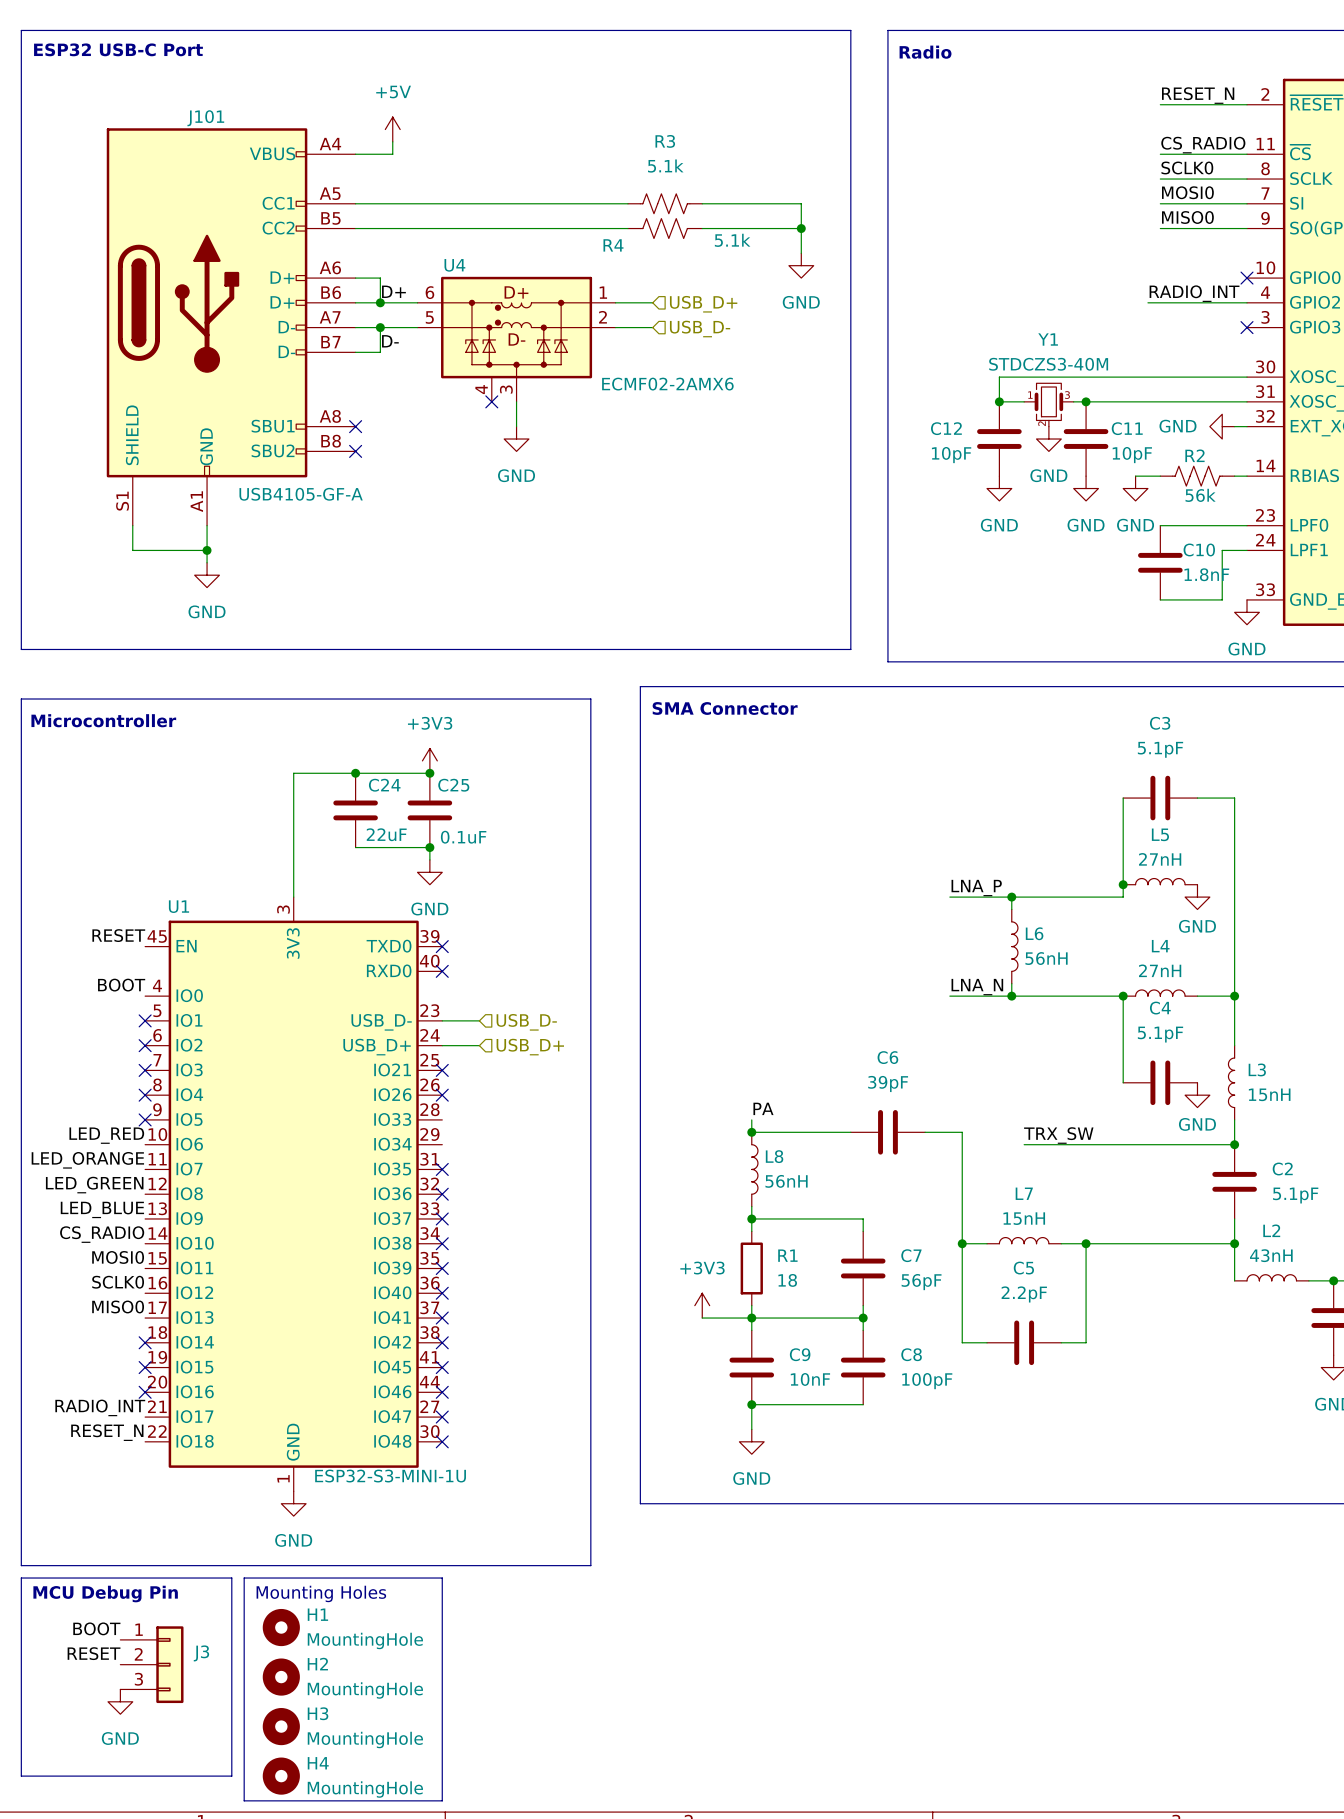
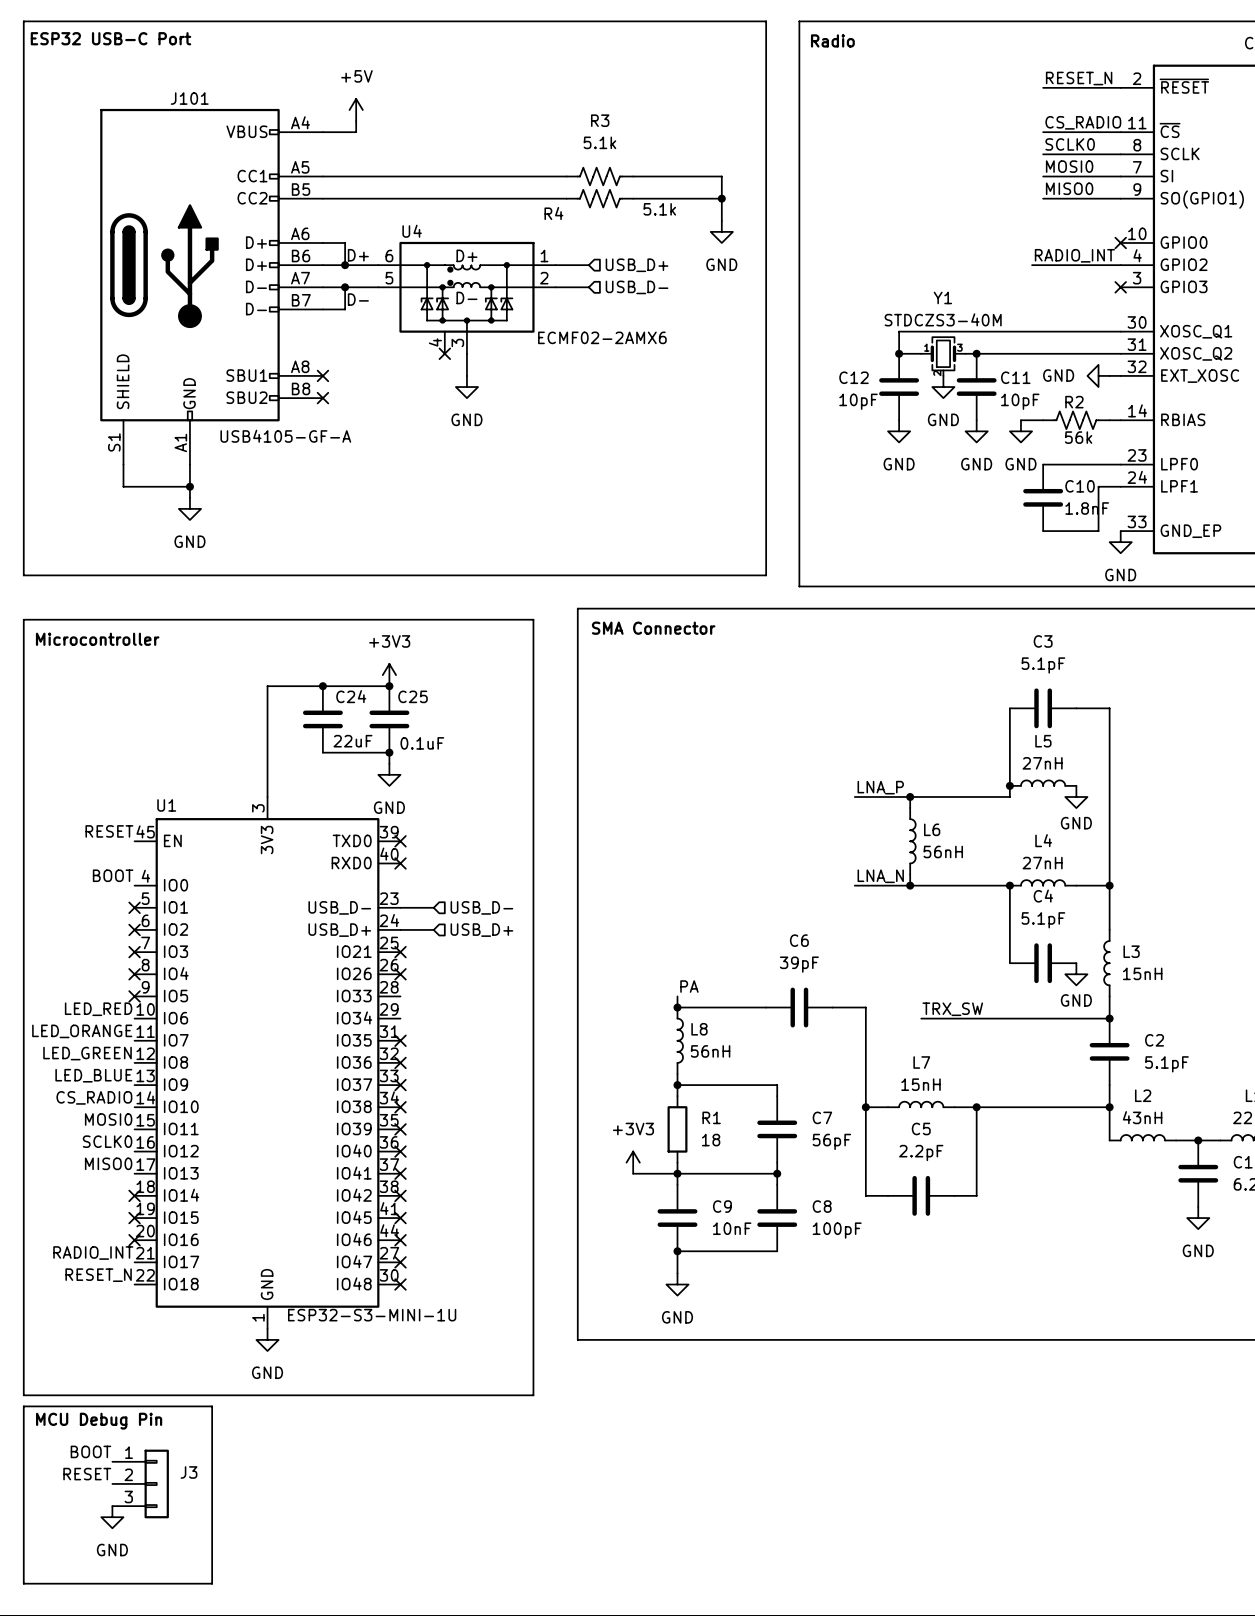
line: (244, 1578) (442, 1578) (442, 1800) (244, 1800) (244, 1578) -> none
text: Mounting Holes (321, 1593) -> none
H1: MountingHole (281, 1627) -> none
H2: MountingHole (281, 1677) -> none
H3: MountingHole (281, 1726) -> none
H4: MountingHole (281, 1776) -> none

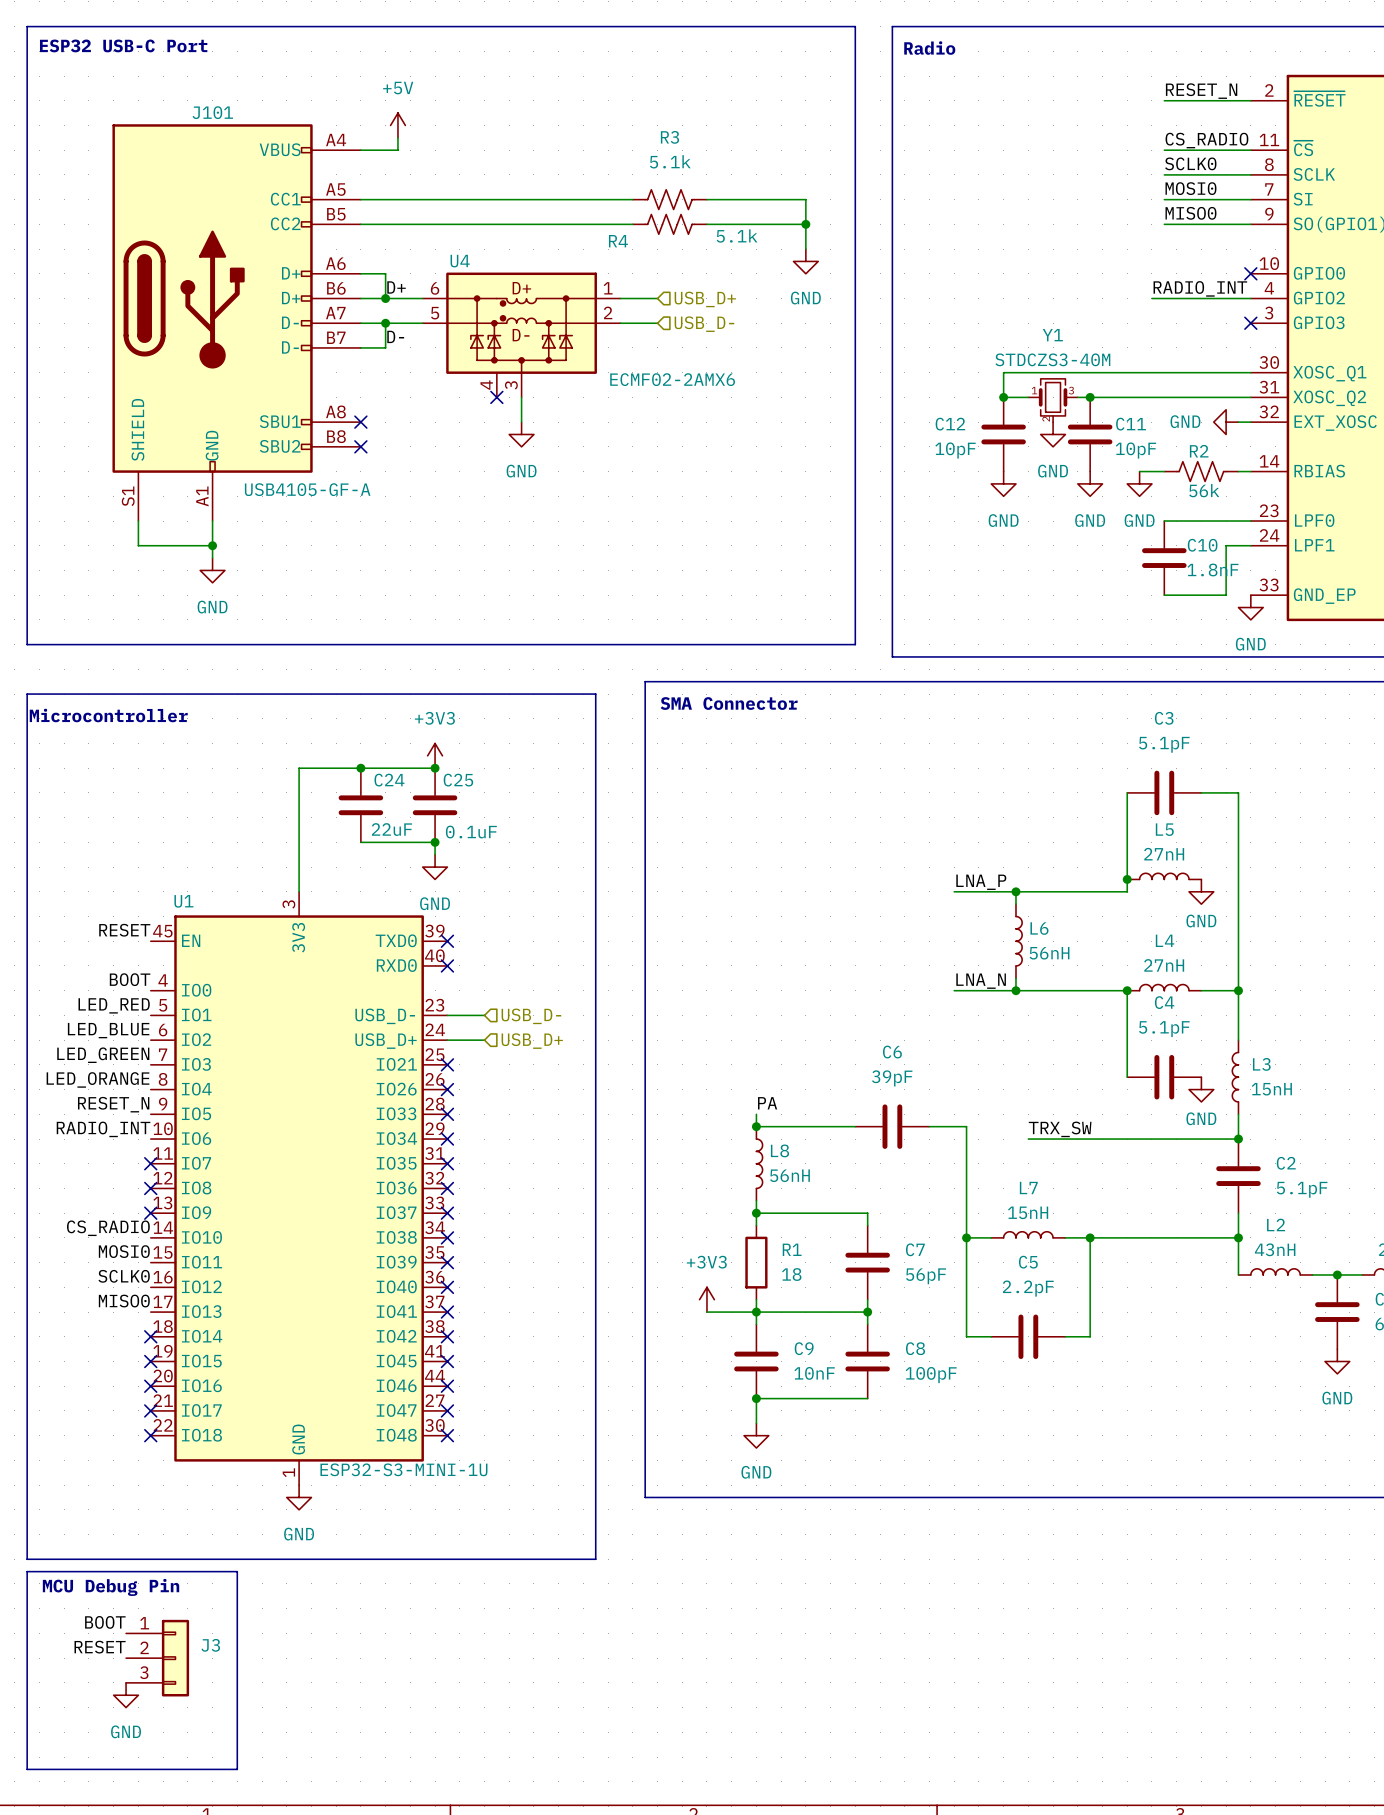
label: none -> LED_RED (114, 1005)
no-connect mark: (134, 907) -> none
no-connect mark: (134, 929) -> none
no-connect mark: (134, 952) -> none
no-connect mark: (134, 974) -> none
label: none -> RESET_N (113, 1104)
no-connect mark: (134, 996) -> none
no-connect mark: none -> (447, 1114)
label: LED_RED (98, 1009) -> RADIO_INT (103, 1129)
no-connect mark: none -> (447, 1139)
label position: LED_ORANGE (82, 1031) -> LED_ORANGE (97, 1079)
no-connect mark: none -> (150, 1163)
label position: LED_GREEN (87, 1053) -> LED_GREEN (103, 1055)
no-connect mark: none -> (150, 1188)
label position: LED_BLUE (93, 1075) -> LED_BLUE (108, 1030)
no-connect mark: none -> (150, 1213)
label: RADIO_INT (93, 1253) -> none
no-connect mark: none -> (150, 1410)
label: RESET_N (98, 1275) -> none
no-connect mark: none -> (150, 1435)

